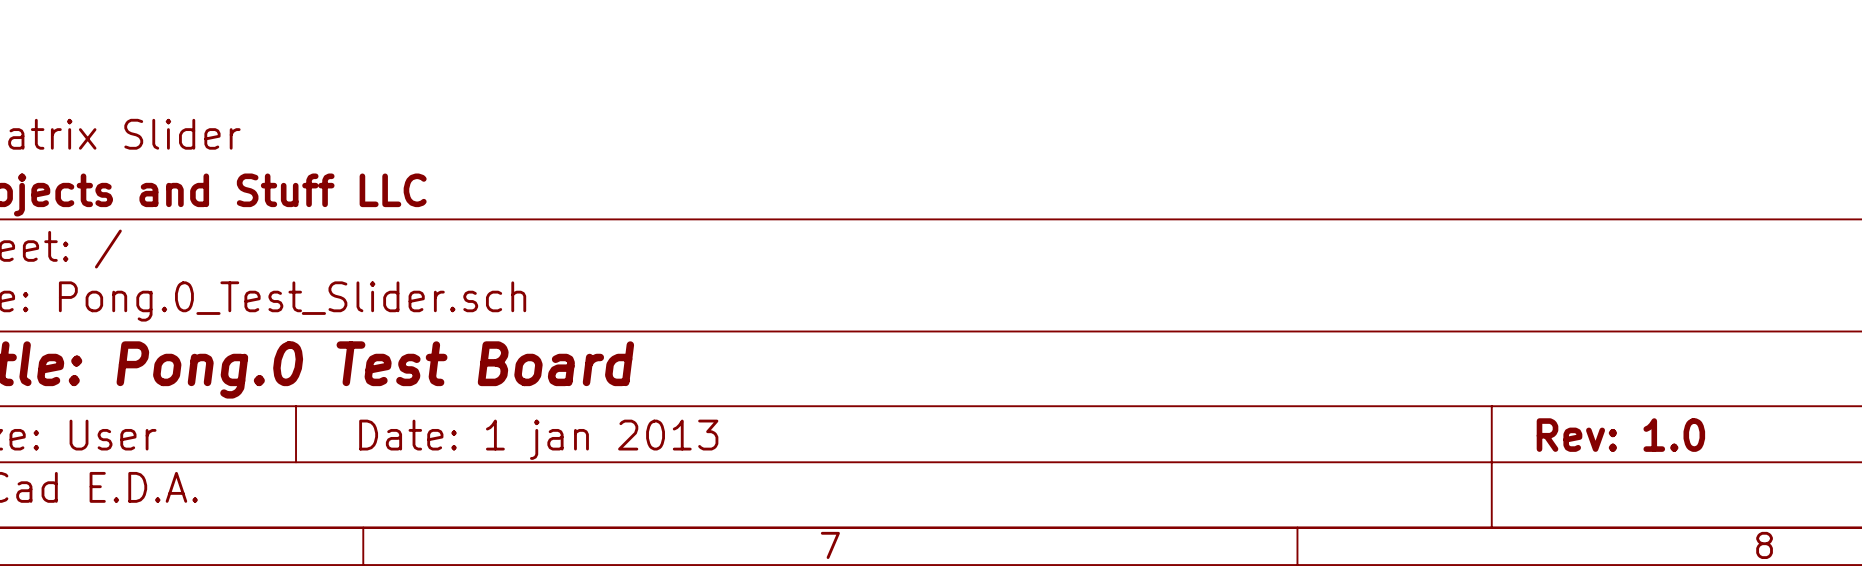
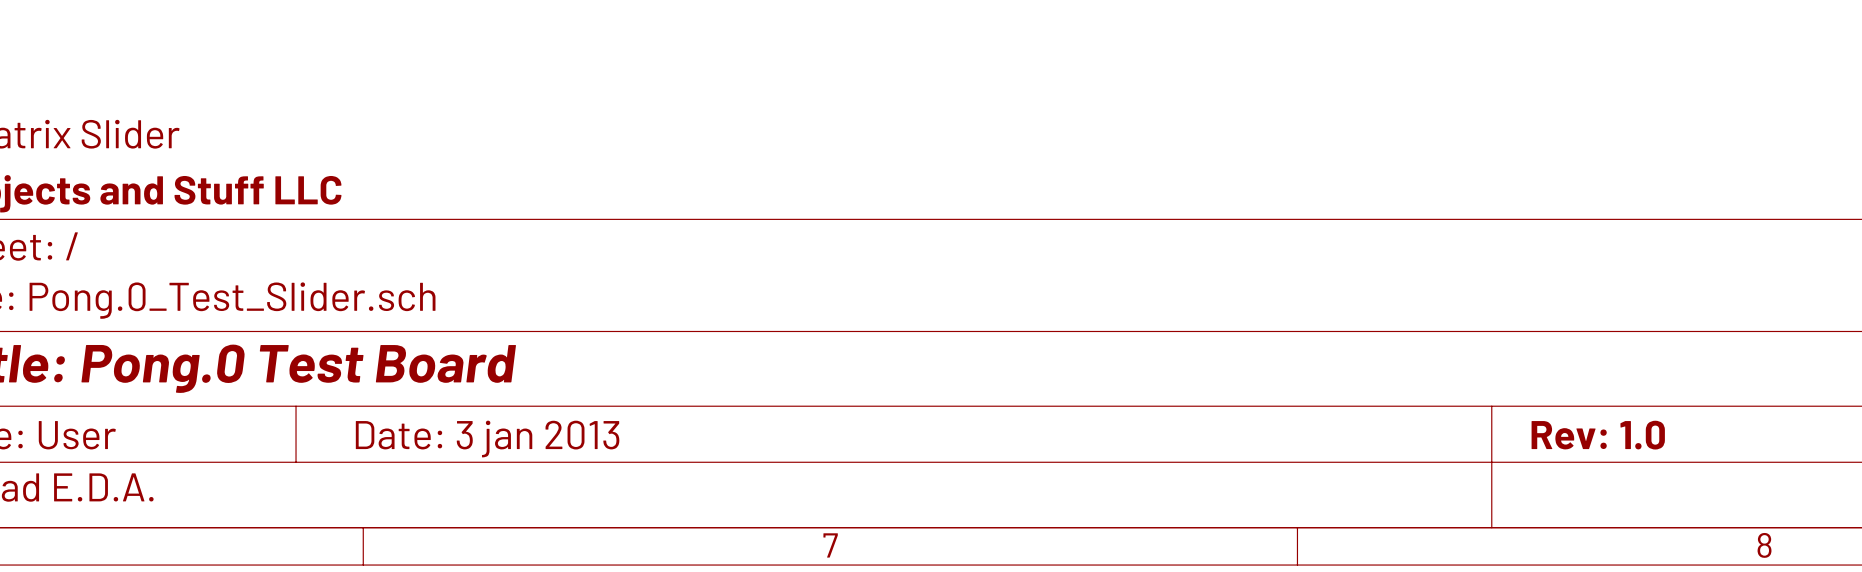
title block: Date: 1 jan 2013 (538, 439) -> Date: 3 jan 2013 (487, 439)

